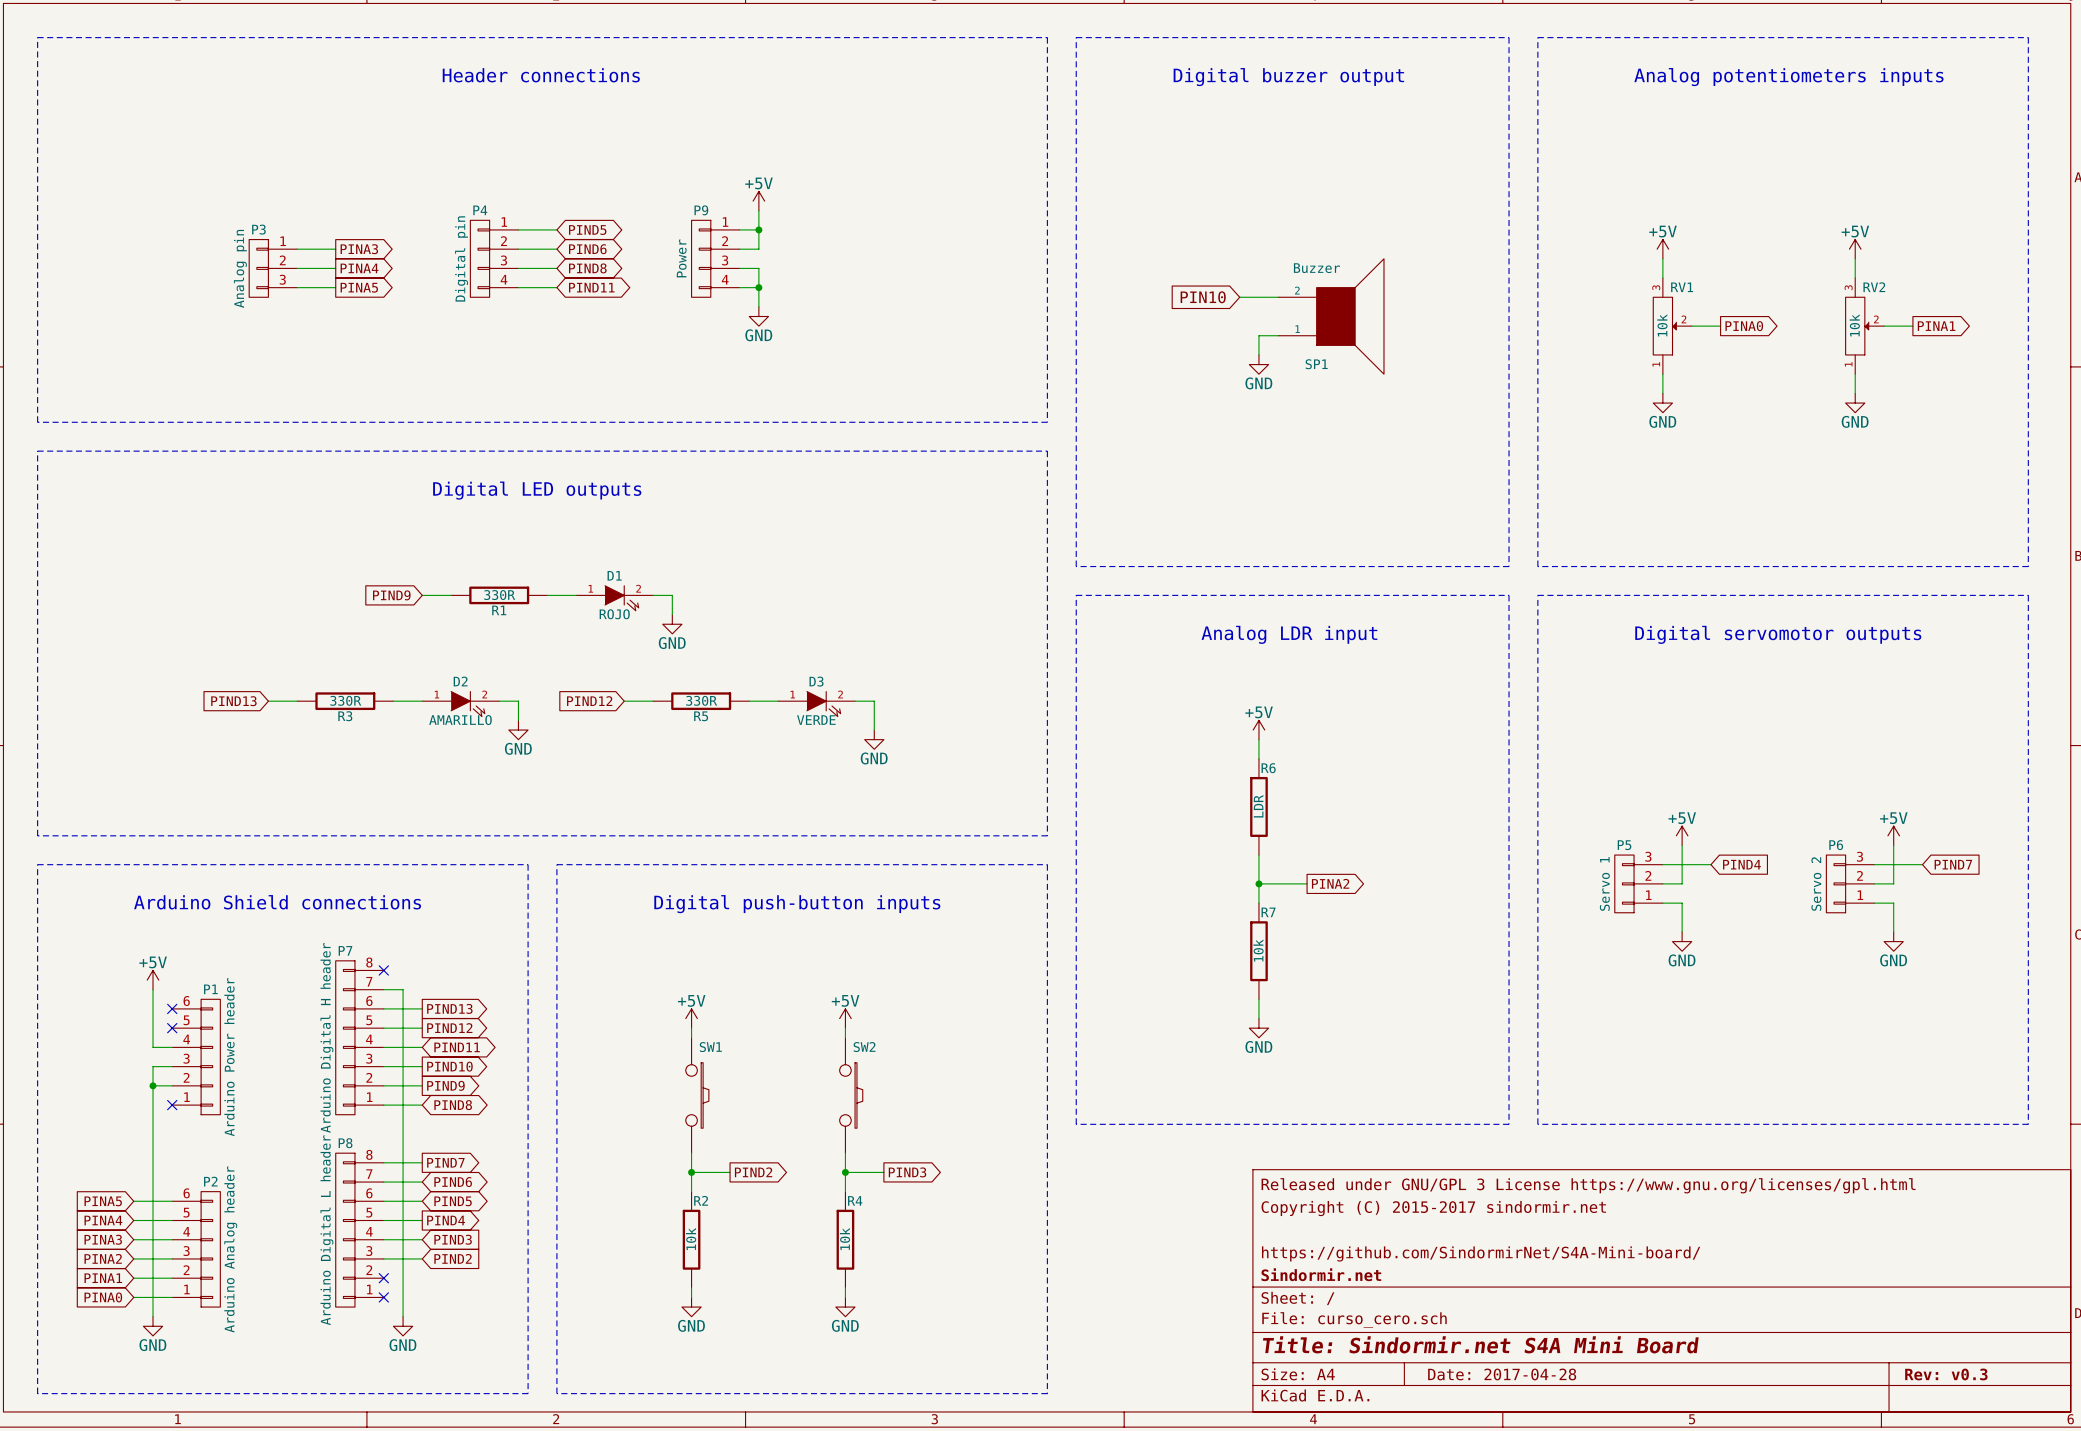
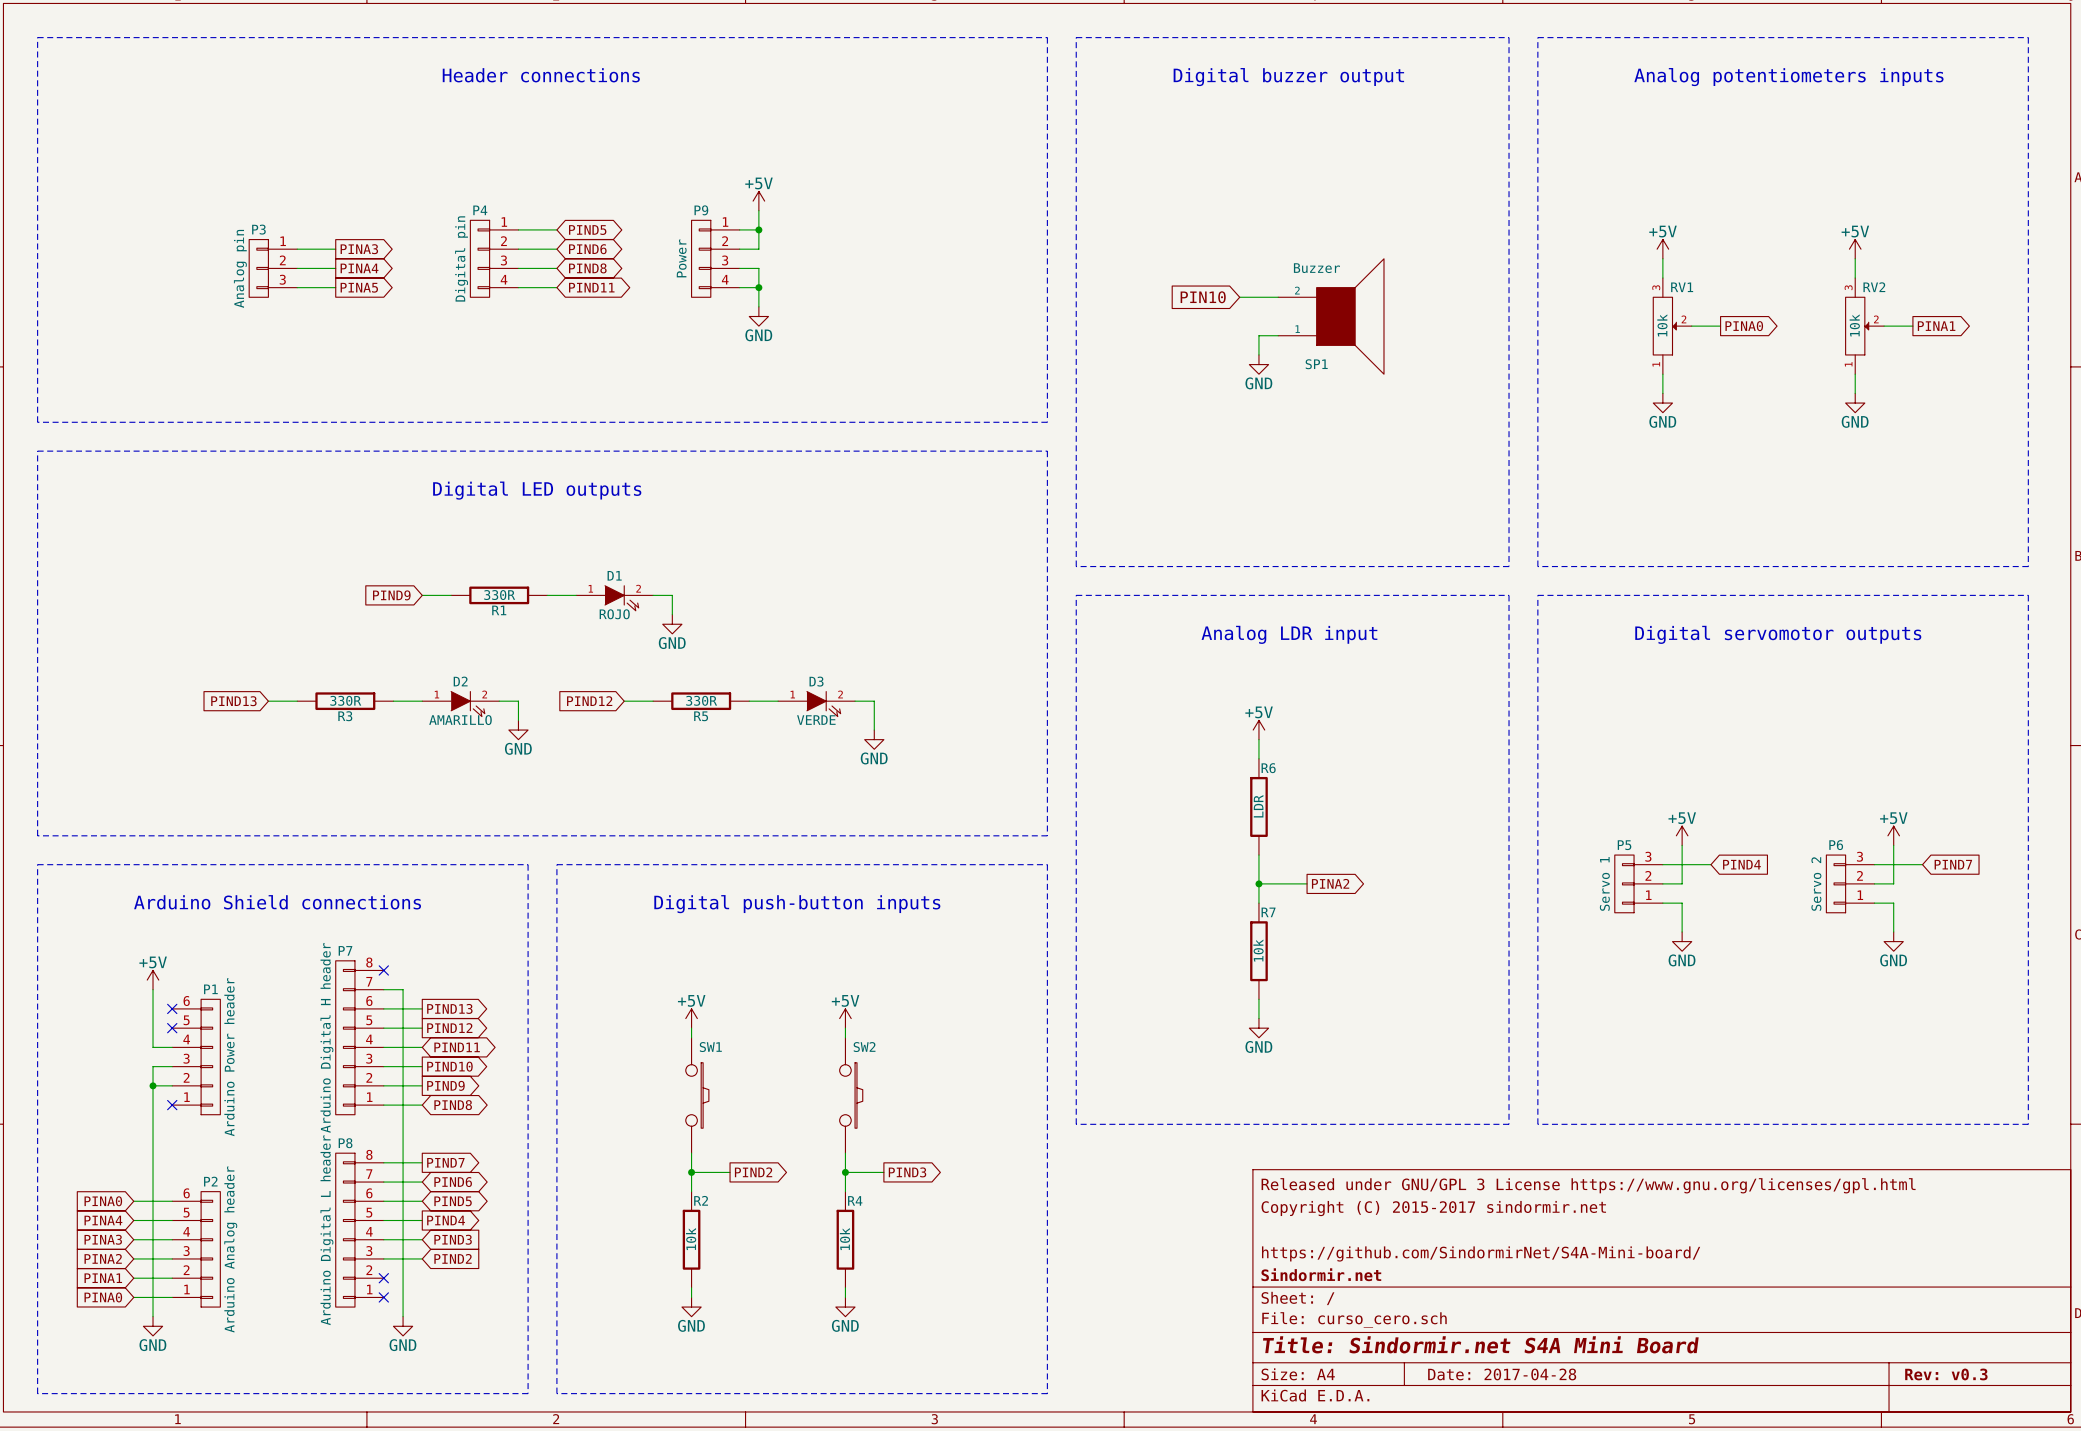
global label: PINA5 (103, 1201) -> PINA0 (103, 1201)

